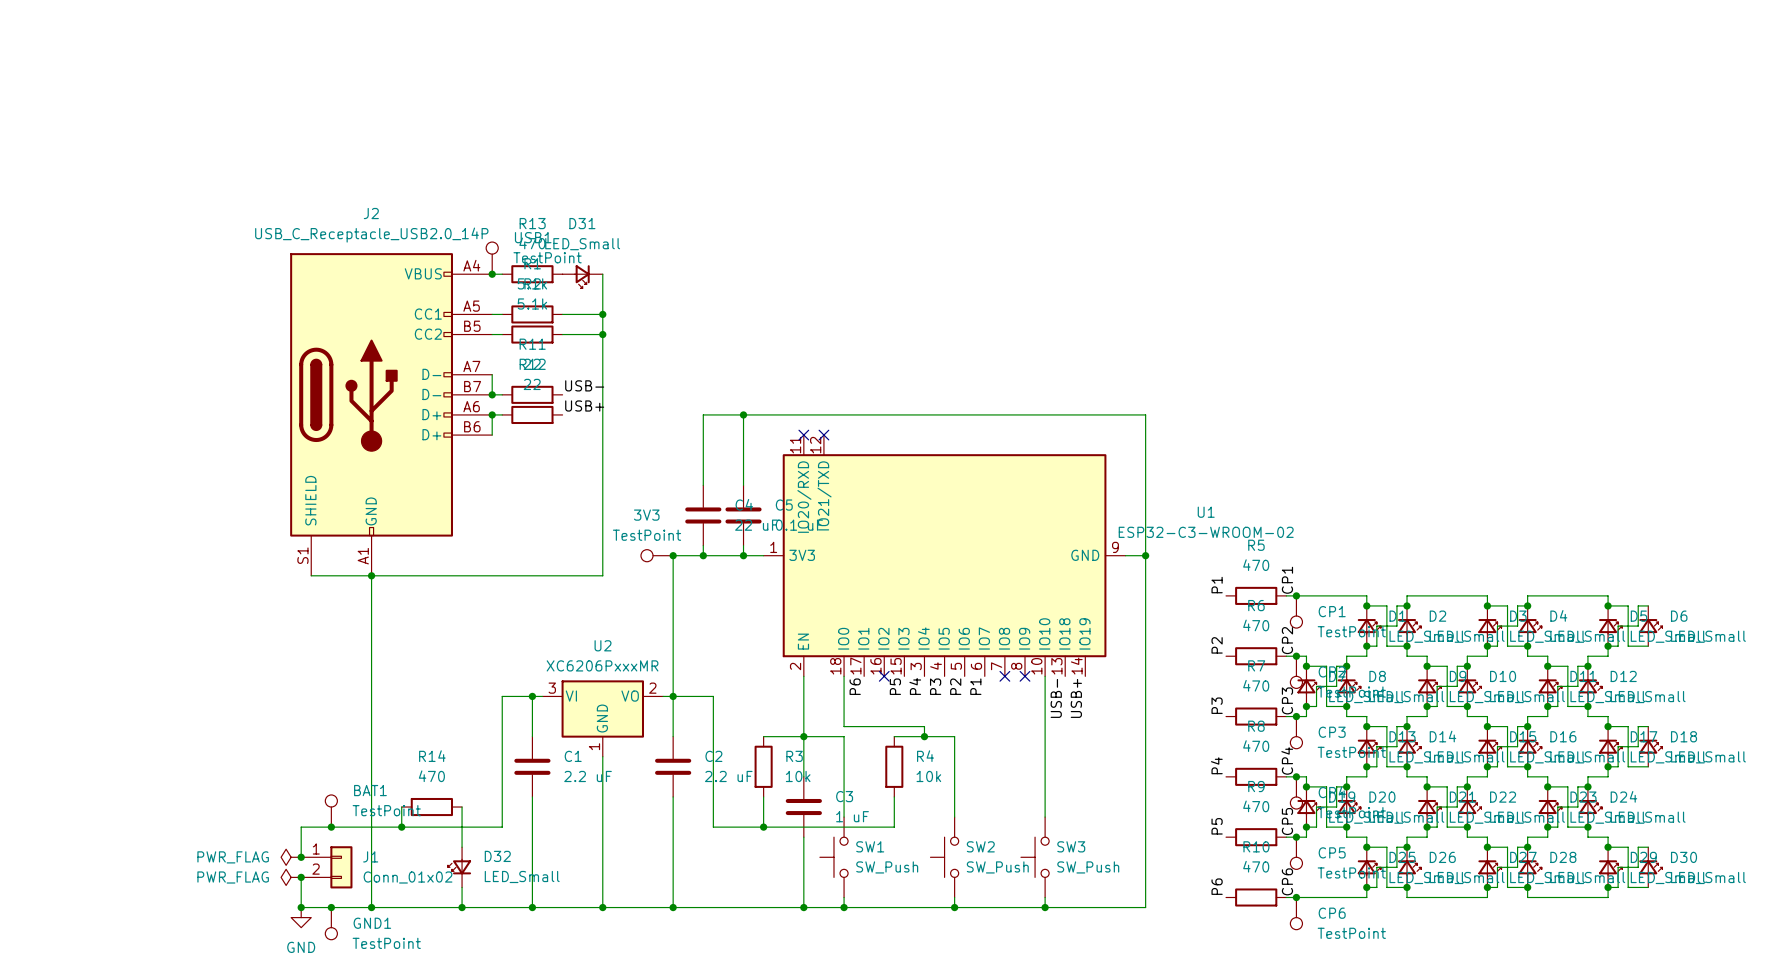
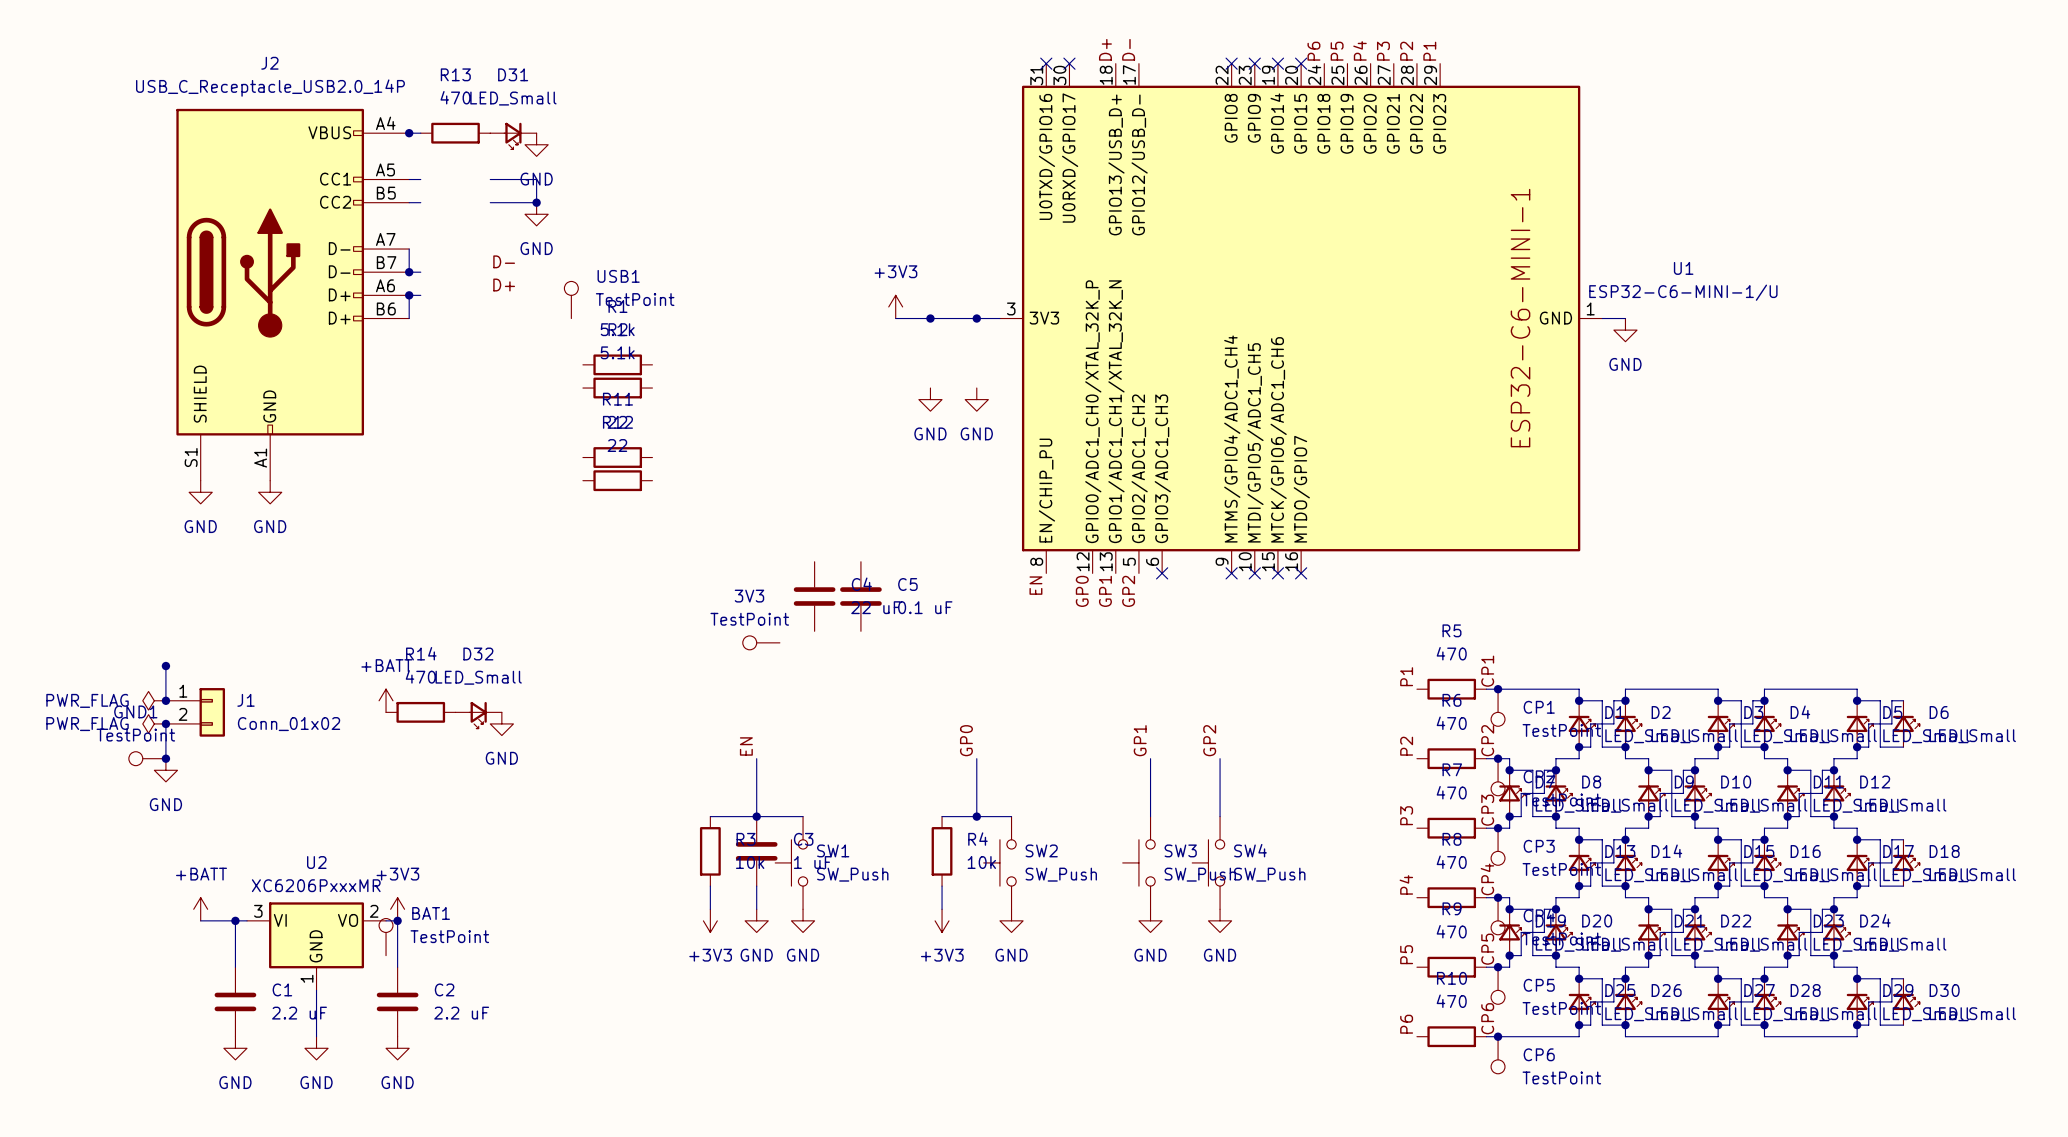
label: none -> D+ (1105, 49)
label: none -> D- (1128, 49)
label: none -> P4 (1360, 50)
label: none -> P6 (1313, 51)
label: none -> P5 (1337, 51)
label: none -> P3 (1383, 51)
label: none -> P2 (1406, 51)
label: none -> P1 (1429, 51)
no-connect mark: none -> (1046, 63)
no-connect mark: none -> (1069, 63)
no-connect mark: none -> (1231, 63)
no-connect mark: none -> (1254, 63)
no-connect mark: none -> (1277, 63)
no-connect mark: none -> (1301, 63)
wire: none -> (409, 133) (420, 133)
junction: none -> (409, 133)
power symbol: none -> GND (536, 144)
wire: none -> (409, 179) (420, 179)
wire: none -> (490, 179) (536, 179) (536, 202) (490, 202)
junction: none -> (536, 202)
power symbol: none -> GND (536, 214)
wire: none -> (409, 249) (409, 272) (420, 272)
label: none -> D- (504, 261)
junction: none -> (409, 272)
label: none -> D+ (504, 285)
junction: none -> (409, 295)
power symbol: none -> +3V3 (895, 306)
wire: (492, 274) (502, 274) -> (409, 202) (420, 202)
junction: (492, 274) -> none
R13 position: (532, 274) -> (455, 133)
wire: (602, 274) (602, 575) (311, 575) -> none
wire: none -> (895, 318) (999, 318)
junction: none -> (930, 318)
junction: none -> (976, 318)
wire: none -> (1602, 318) (1625, 318)
D31 position: (582, 276) -> (513, 136)
power symbol: none -> GND (1625, 330)
wire: (492, 314) (502, 314) -> none
wire: (562, 314) (602, 314) -> none
junction: (602, 314) -> none
wire: (492, 334) (502, 334) -> none
wire: (562, 334) (602, 334) -> none
junction: (602, 334) -> none
power symbol: none -> GND (930, 399)
power symbol: none -> GND (976, 399)
wire: (492, 374) (492, 394) (502, 394) -> none
label: USB- (584, 385) -> none
junction: (492, 394) -> none
label: USB+ (584, 405) -> none
J2 position: (391, 414) -> (292, 294)
junction: (492, 414) -> none
wire: (502, 414) (492, 414) (492, 435) -> none
wire: (743, 414) (743, 485) -> none
junction: (743, 414) -> none
power symbol: none -> GND (200, 492)
power symbol: none -> GND (270, 492)
U1 symbol: [763, 435, 1126, 677] -> [999, 63, 1603, 574]
no-connect mark: (803, 435) -> none
no-connect mark: (823, 435) -> none
wire: (703, 485) (703, 414) (1145, 414) (1145, 907) (301, 907) (301, 877) -> none
no-connect mark: none -> (1162, 573)
no-connect mark: none -> (1231, 573)
no-connect mark: none -> (1254, 573)
no-connect mark: none -> (1277, 573)
no-connect mark: none -> (1301, 573)
label: none -> EN (1035, 585)
label: none -> GP0 (1082, 591)
label: none -> GP1 (1105, 591)
label: none -> GP2 (1128, 591)
U1 name position: U1 (1206, 512) -> U1 (1683, 268)
U1 value: ESP32-C3-WROOM-02 (1206, 532) -> ESP32-C6-MINI-1/U (1683, 292)
wire: (703, 545) (703, 555) -> none
wire: (743, 545) (743, 555) -> none
junction: (673, 555) -> none
junction: (703, 555) -> none
junction: (743, 555) -> none
wire: (763, 555) (673, 555) (673, 736) -> none
wire: (1125, 555) (1145, 555) -> none
junction: (1145, 555) -> none
wire: none -> (165, 666) (165, 700)
junction: none -> (165, 666)
wire: (371, 575) (371, 907) -> none
junction: (371, 575) -> none
power symbol: none -> PWR_FLAG (154, 700)
junction: none -> (165, 700)
power symbol: none -> +BATT (386, 700)
power symbol: none -> PWR_FLAG (154, 723)
wire: none -> (165, 723) (165, 758)
junction: none -> (165, 723)
power symbol: none -> GND (501, 723)
label: none -> GP0 (966, 740)
label: none -> GP1 (1140, 740)
label: none -> GP2 (1209, 740)
label: none -> EN (746, 746)
junction: none -> (165, 758)
wire: none -> (756, 758) (756, 816)
wire: none -> (1150, 758) (1150, 816)
wire: none -> (1220, 758) (1220, 816)
power symbol: none -> GND (165, 770)
wire: (803, 676) (803, 776) -> none
no-connect mark: (884, 676) -> none
no-connect mark: (1004, 676) -> none
no-connect mark: (1024, 676) -> none
wire: (1045, 676) (1045, 817) -> none
label: P6 (855, 686) -> none
label: P5 (895, 686) -> none
label: P4 (915, 686) -> none
label: P3 (935, 686) -> none
label: P2 (955, 686) -> none
label: P1 (975, 686) -> none
wire: (532, 696) (532, 736) -> none
junction: (532, 696) -> none
wire: (542, 696) (502, 696) (502, 827) (301, 827) (301, 857) -> none
wire: (663, 696) (713, 696) (713, 827) (894, 827) (894, 796) -> none
junction position: (673, 696) -> (756, 816)
label: USB- (1056, 698) -> none
label: USB+ (1076, 698) -> none
wire: none -> (710, 816) (803, 816)
wire: none -> (942, 816) (1011, 816)
wire: (844, 706) (844, 726) (924, 726) (924, 736) -> none
junction: none -> (976, 816)
U2 position: (602, 718) -> (316, 946)
wire: (763, 736) (844, 736) (844, 817) -> none
junction: (803, 736) -> none
wire: (894, 736) (954, 736) (954, 817) -> none
junction: (924, 736) -> none
SW4: none -> SW_Push (1208, 862)
wire: (602, 756) (602, 907) -> none
C1 position: (532, 766) -> (235, 1001)
wire: none -> (756, 886) (756, 909)
C2 position: (673, 766) -> (397, 1001)
R3 position: (763, 766) -> (710, 851)
wire: none -> (942, 886) (942, 909)
R4 position: (894, 766) -> (942, 851)
power symbol: none -> +BATT (200, 909)
power symbol: none -> +3V3 (397, 909)
wire: none -> (200, 920) (247, 920)
wire: none -> (235, 920) (235, 967)
junction: none -> (235, 920)
wire: none -> (386, 920) (397, 920) (397, 967)
wire: (532, 796) (532, 907) -> none
power symbol: none -> +3V3 (710, 920)
power symbol: none -> GND (756, 920)
wire: (673, 796) (673, 907) -> none
power symbol: none -> GND (803, 920)
wire: (763, 796) (763, 827) -> none
power symbol: none -> +3V3 (942, 920)
power symbol: none -> GND (1011, 920)
power symbol: none -> GND (1150, 920)
power symbol: none -> GND (1220, 920)
wire: (401, 807) (401, 827) -> none
R14 position: (431, 807) -> (420, 712)
wire: (462, 807) (462, 847) -> (316, 990) (316, 1036)
C3 position: (803, 807) -> (756, 851)
junction position: (331, 827) -> (397, 920)
junction: (401, 827) -> none
junction: (763, 827) -> none
wire: (803, 837) (803, 907) -> none
D32 name position: D32 (497, 856) -> D32 (478, 654)
power symbol: PWR_FLAG (291, 857) -> none
junction: (301, 857) -> none
SW1 position: (833, 857) -> (791, 862)
SW2 position: (944, 857) -> (999, 862)
SW3 position: (1035, 857) -> (1138, 862)
D32 rotation: 0° (459, 866) -> 90° counterclockwise (478, 715)
J1 position: (326, 867) -> (195, 712)
D32 position: (459, 867) -> (478, 715)
D32 value position: LED_Small (522, 876) -> LED_Small (478, 677)
power symbol: PWR_FLAG (291, 877) -> none
junction: (301, 877) -> none
wire: (462, 887) (462, 907) -> (710, 886) (710, 909)
wire: (844, 897) (844, 907) -> none
wire: (954, 897) (954, 907) -> none
wire: (1045, 897) (1045, 907) -> none
power symbol: none -> GND (235, 1048)
power symbol: none -> GND (316, 1048)
junction: (301, 907) -> none
junction: (331, 907) -> none
power symbol: none -> GND (397, 1048)
junction: (371, 907) -> none
junction: (462, 907) -> none
junction: (532, 907) -> none
junction: (602, 907) -> none
junction: (673, 907) -> none
junction: (803, 907) -> none
junction: (844, 907) -> none
junction: (954, 907) -> none
junction: (1045, 907) -> none
power symbol: GND (301, 917) -> none
GND1 position: (331, 923) -> (147, 758)
GND1 name position: GND1 (372, 923) -> GND1 (135, 711)
GND1 rotation: 0° (331, 933) -> 90° clockwise (135, 758)
GND1 value position: TestPoint (386, 943) -> TestPoint (135, 735)

